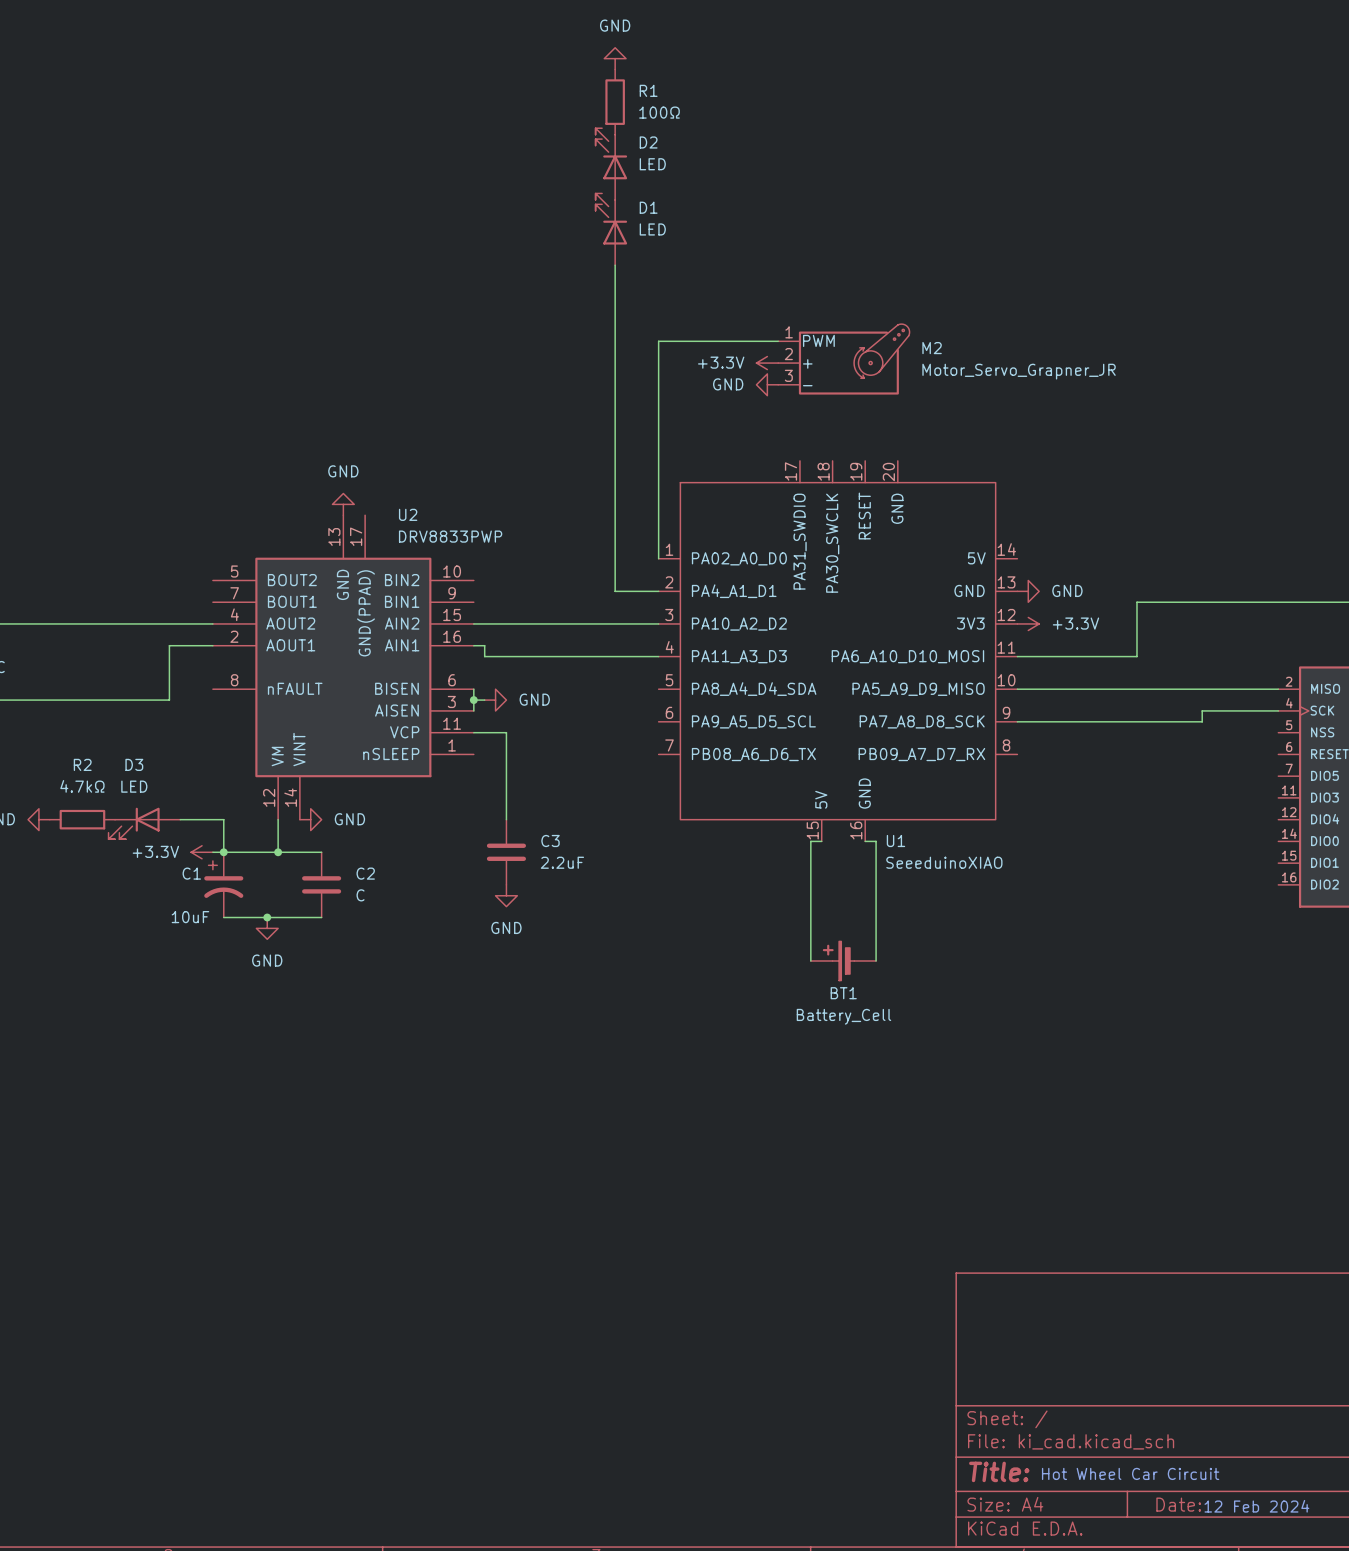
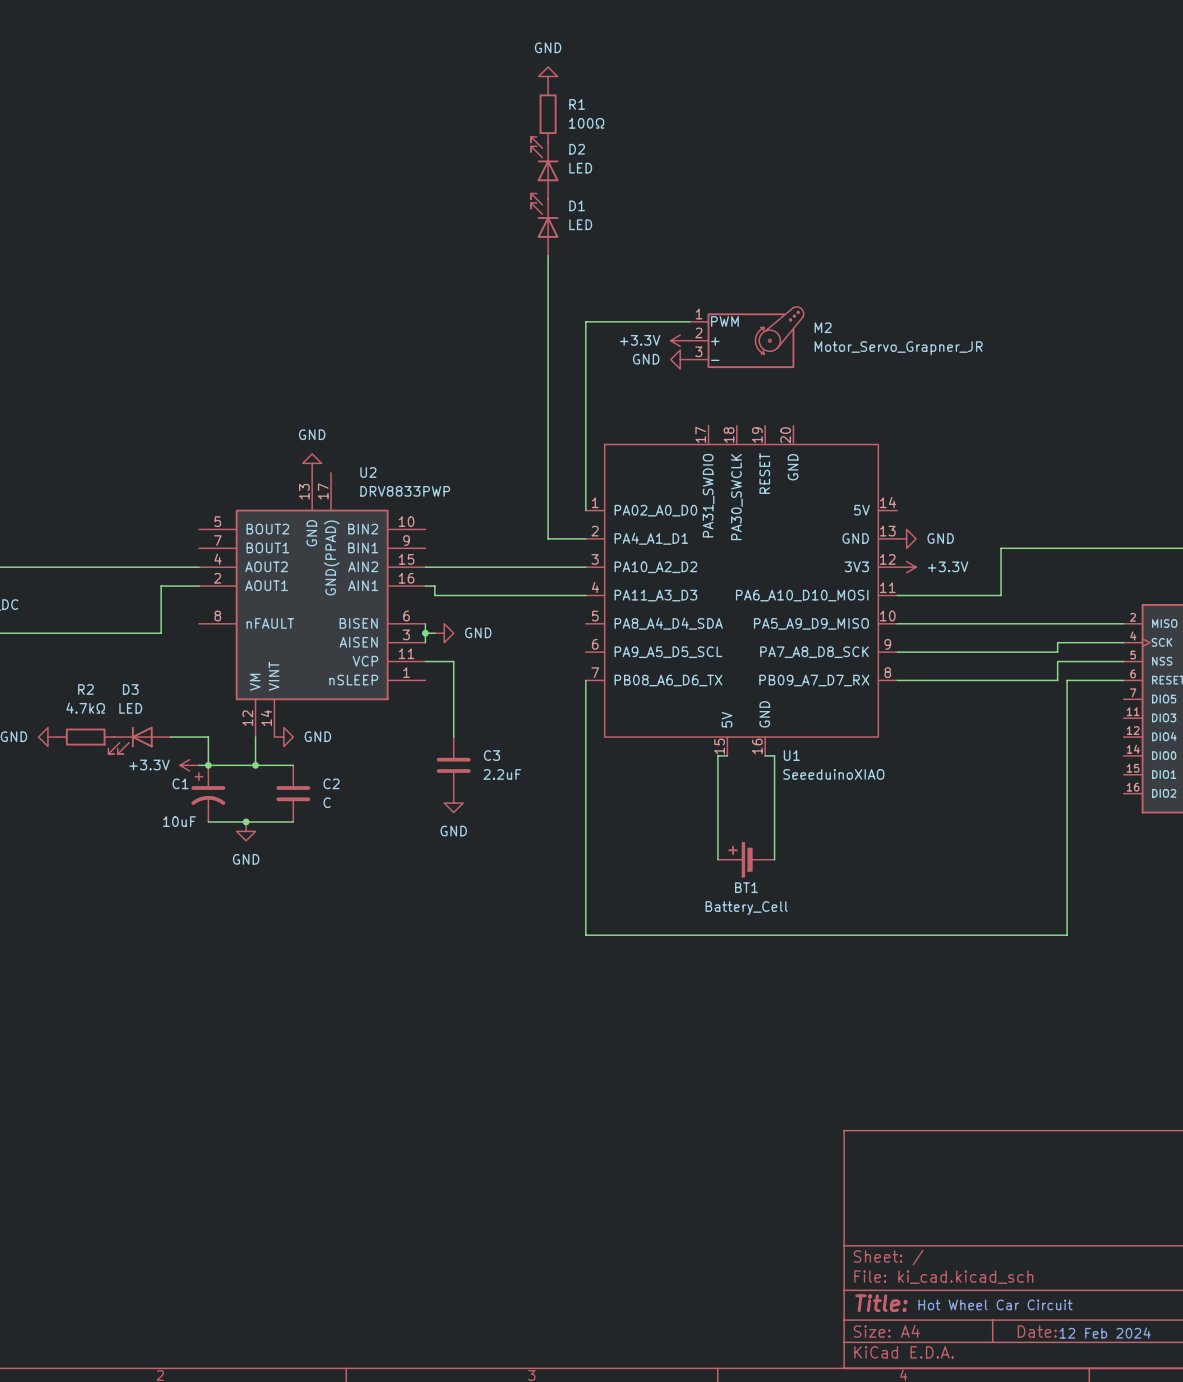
wire: none -> (1123, 661) (1057, 661) (1057, 680) (897, 680)
wire: none -> (585, 680) (585, 935) (1067, 935) (1067, 680) (1123, 680)

